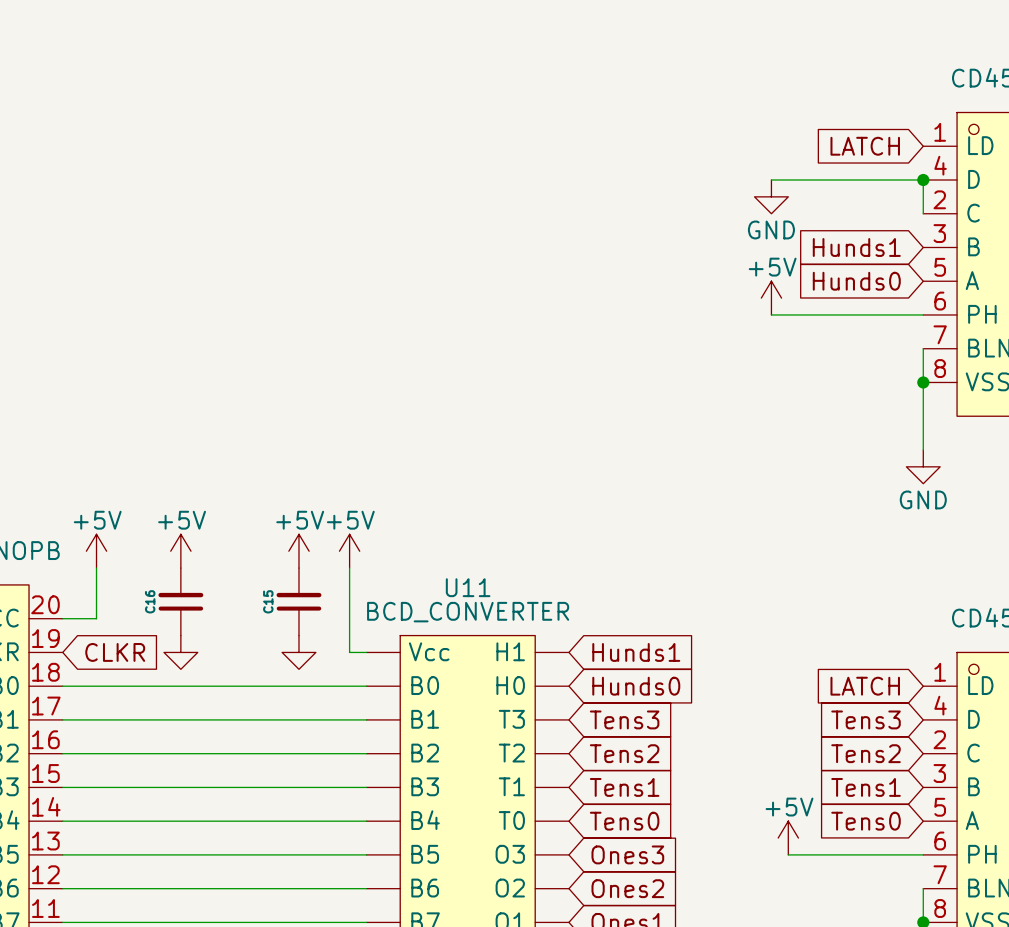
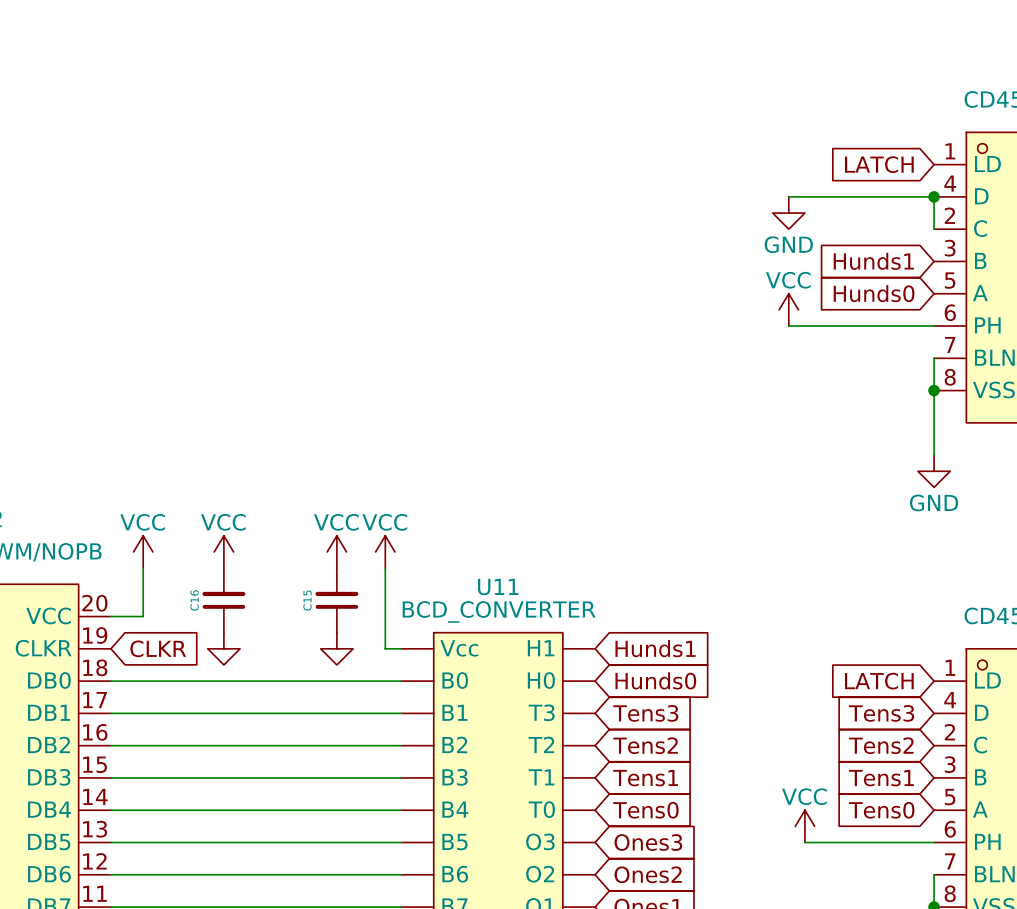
power symbol: +5V (771, 298) -> VCC (788, 309)
power symbol: +5V (96, 551) -> VCC (143, 551)
power symbol: +5V (180, 551) -> VCC (223, 551)
power symbol: +5V (298, 551) -> VCC (336, 551)
power symbol: +5V (349, 551) -> VCC (385, 551)
power symbol: +5V (788, 838) -> VCC (804, 826)

